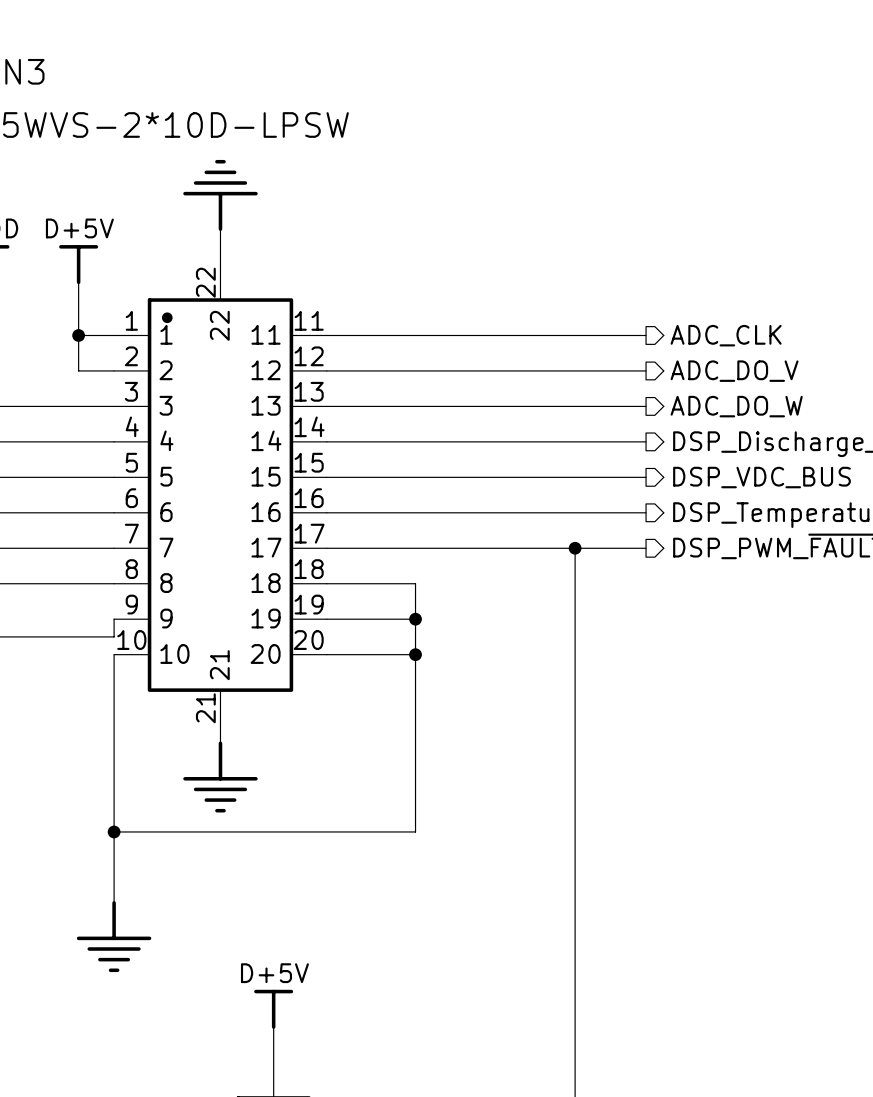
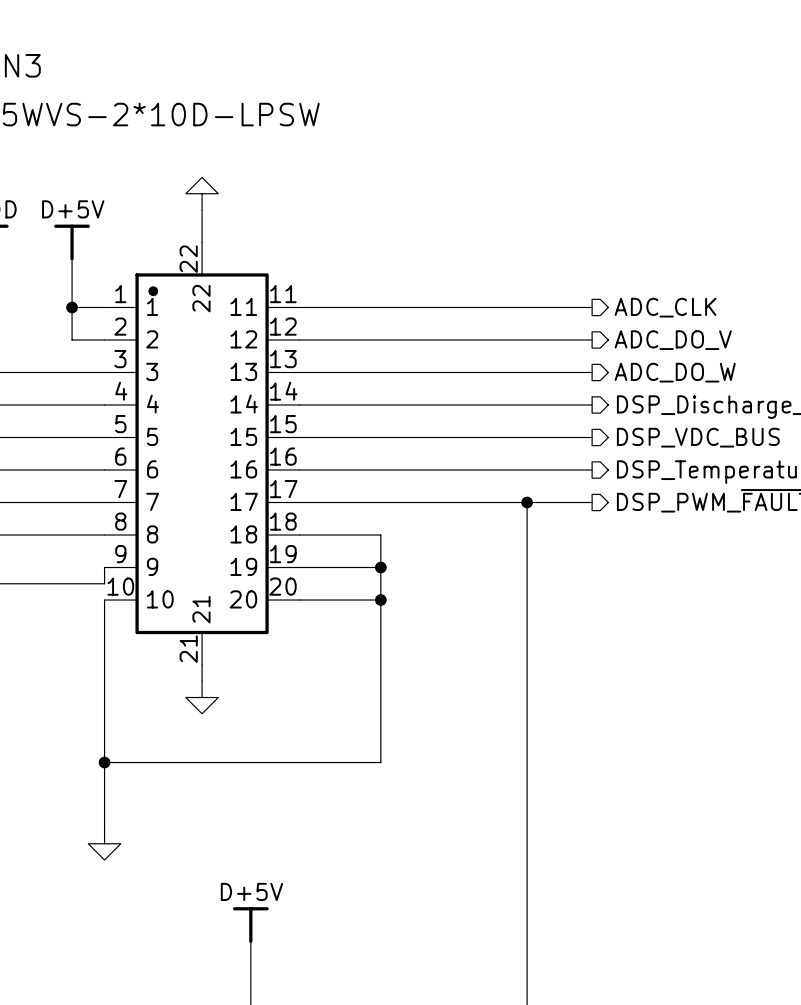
power symbol: (220, 195) -> none
power symbol: none -> (202, 193)
power symbol: none -> (202, 697)
power symbol: (220, 777) -> none
power symbol: none -> (104, 843)
power symbol: (114, 936) -> none

